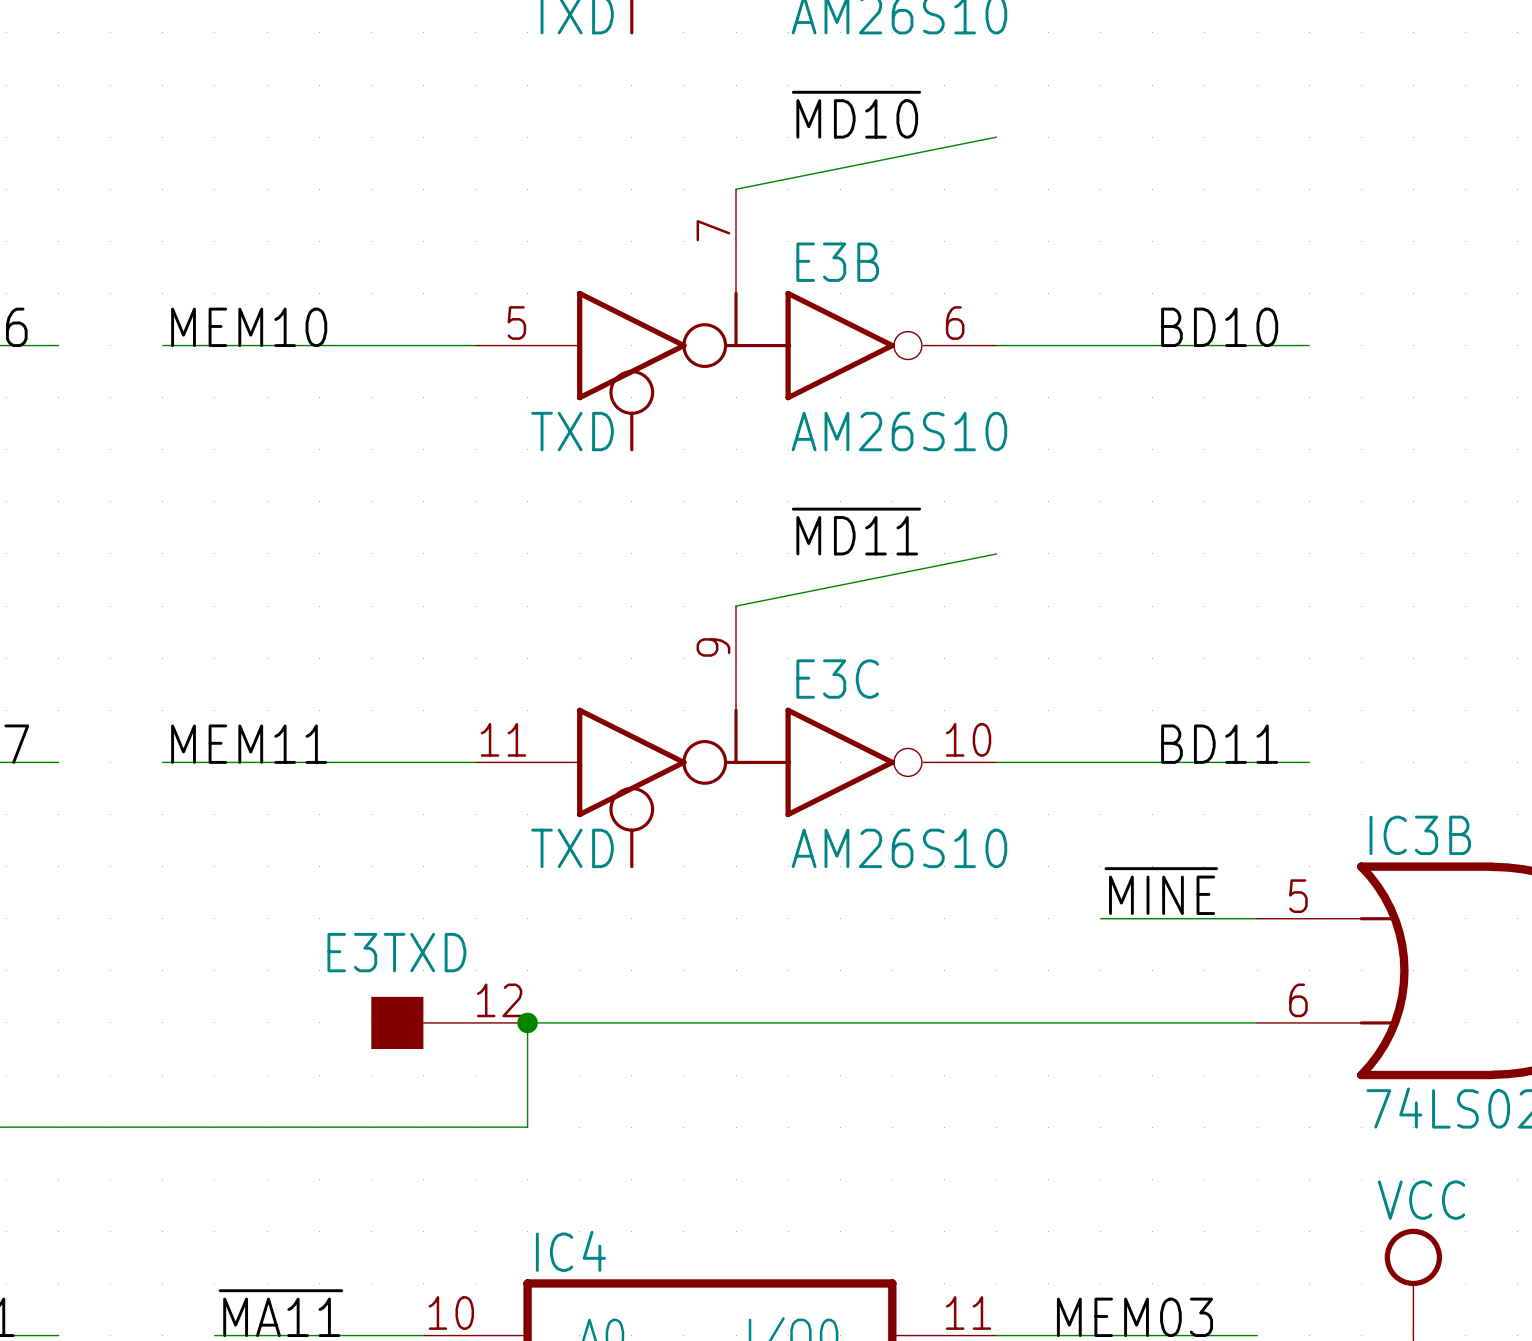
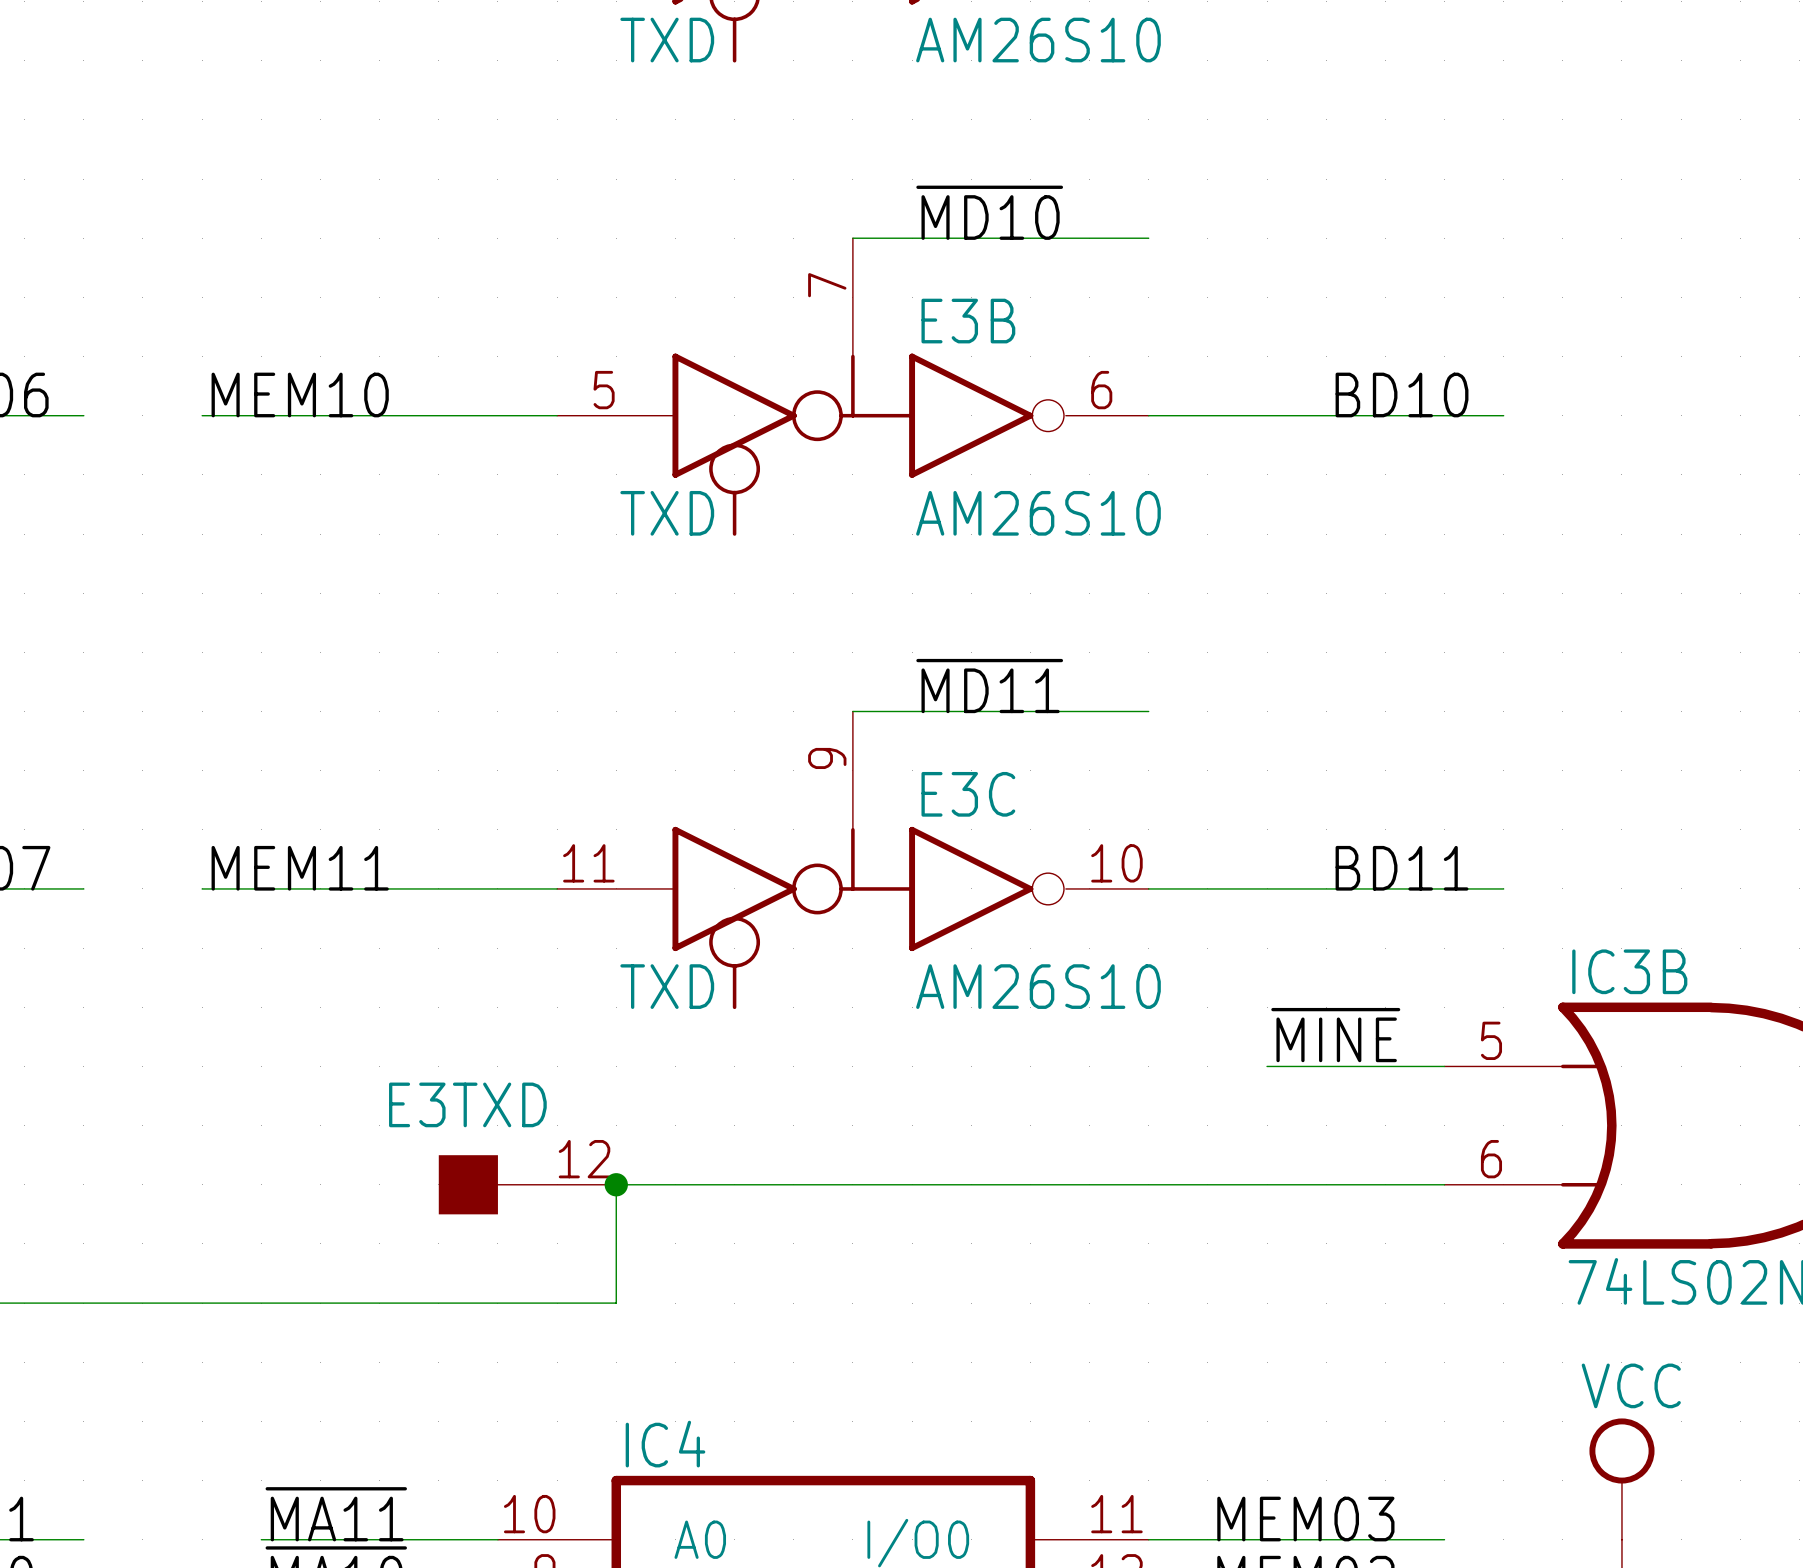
label position: ~{MD10} (856, 114) -> ~{MD10} (989, 212)
wire: (996, 137) (736, 189) -> (1148, 238) (852, 238)
label position: ~{MD11} (856, 531) -> ~{MD11} (989, 686)
wire: (996, 553) (736, 606) -> (1148, 711) (852, 711)

